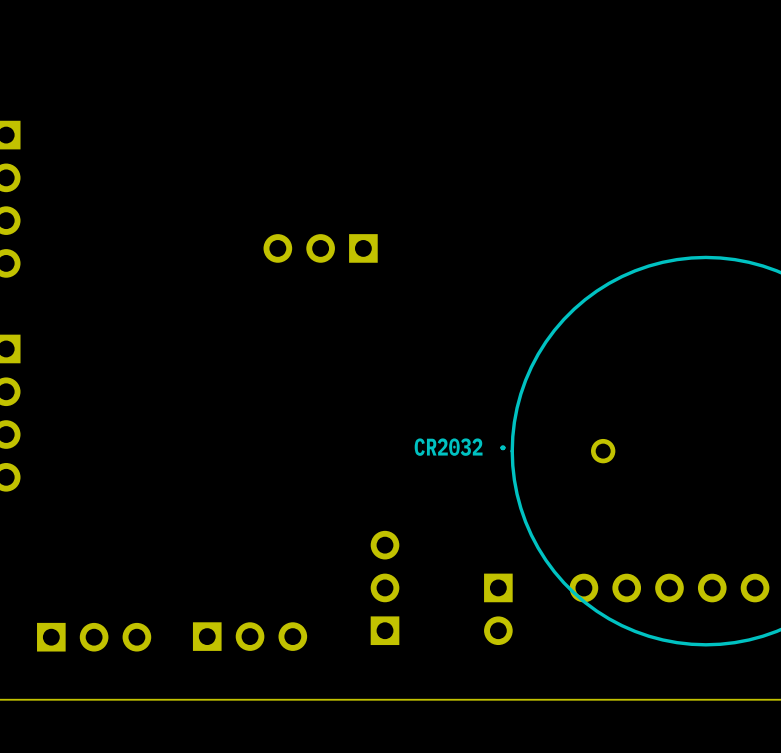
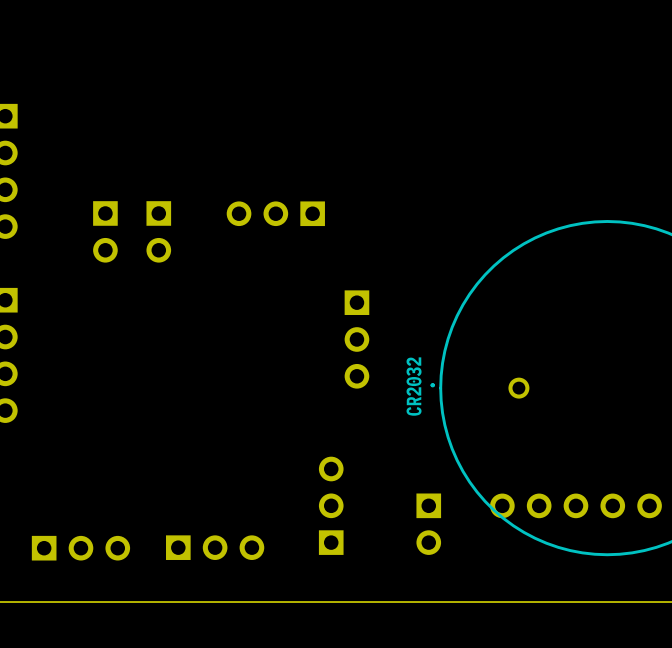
part: none -> (105, 231)
part: none -> (158, 231)
part: none -> (356, 339)
text rotation: 0° (448, 447) -> 90° counterclockwise (414, 386)

